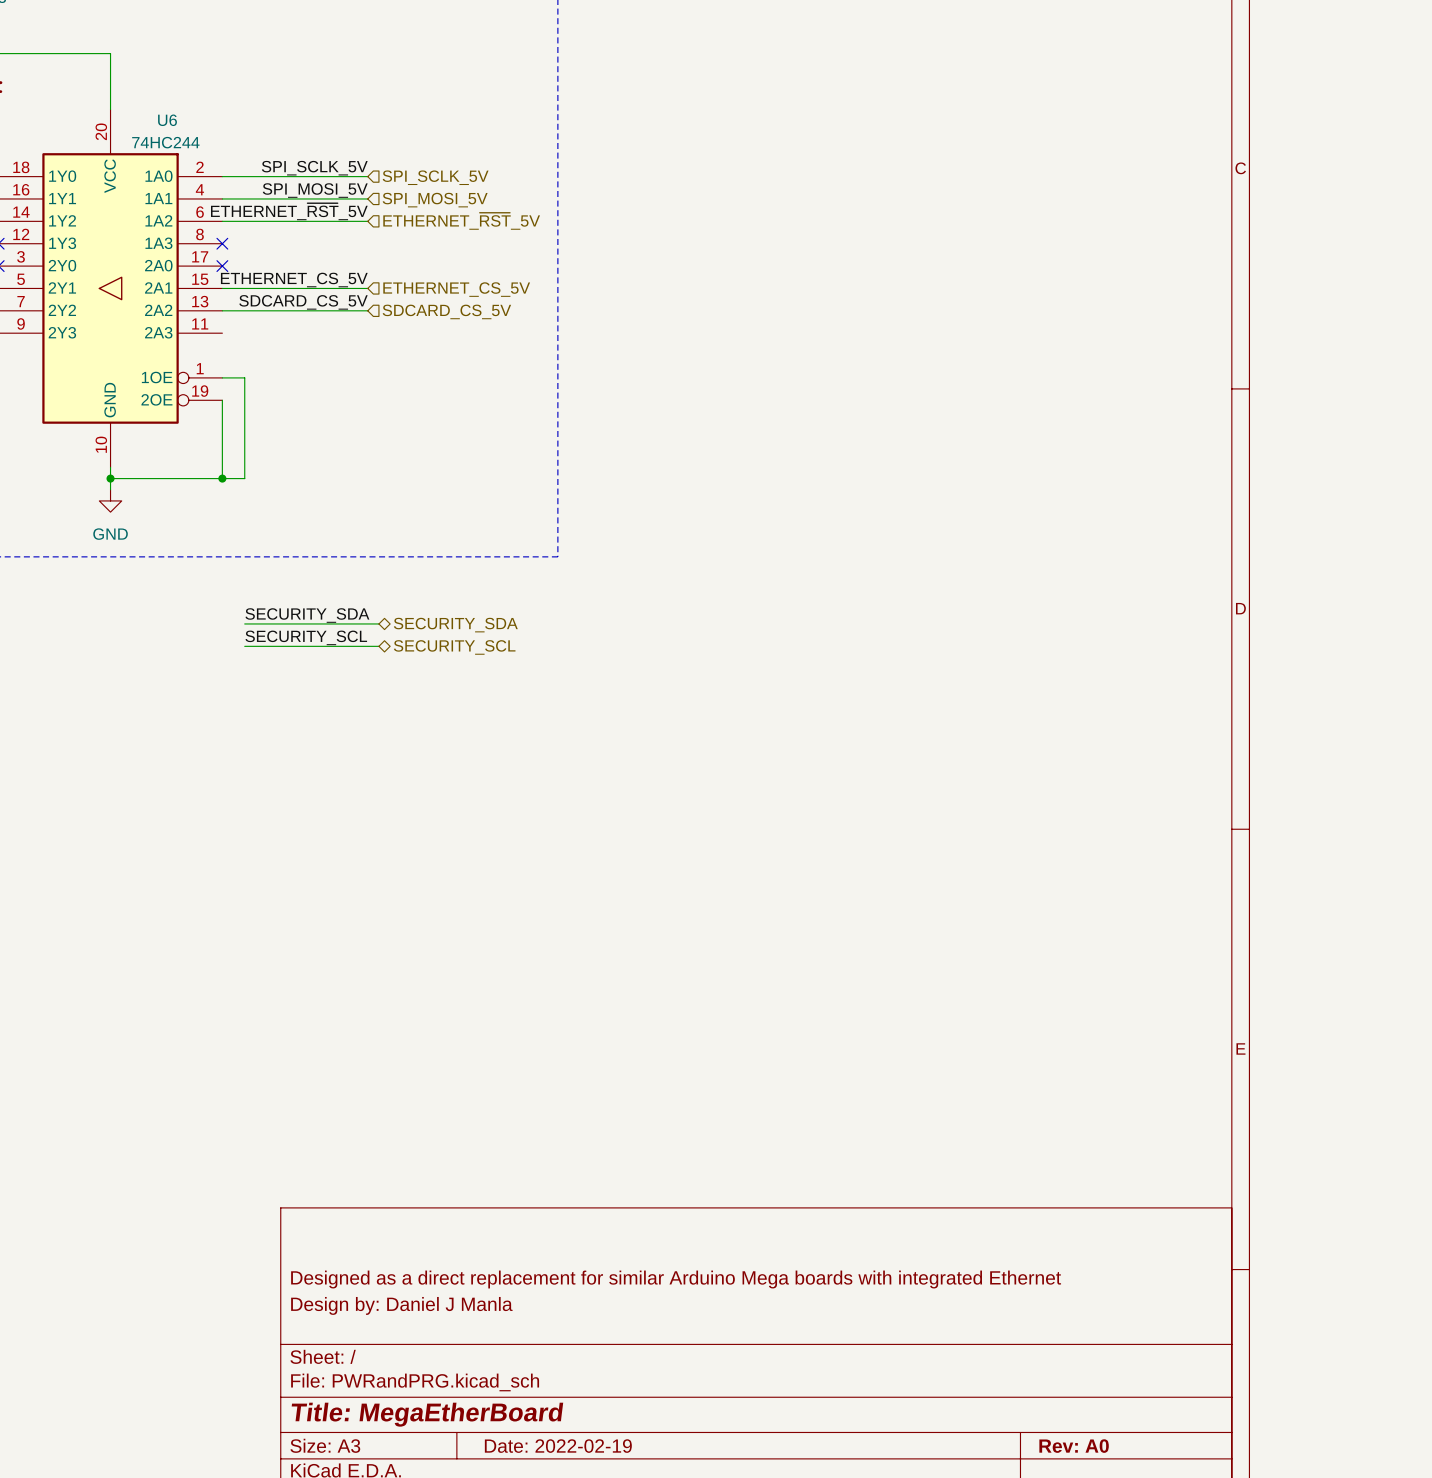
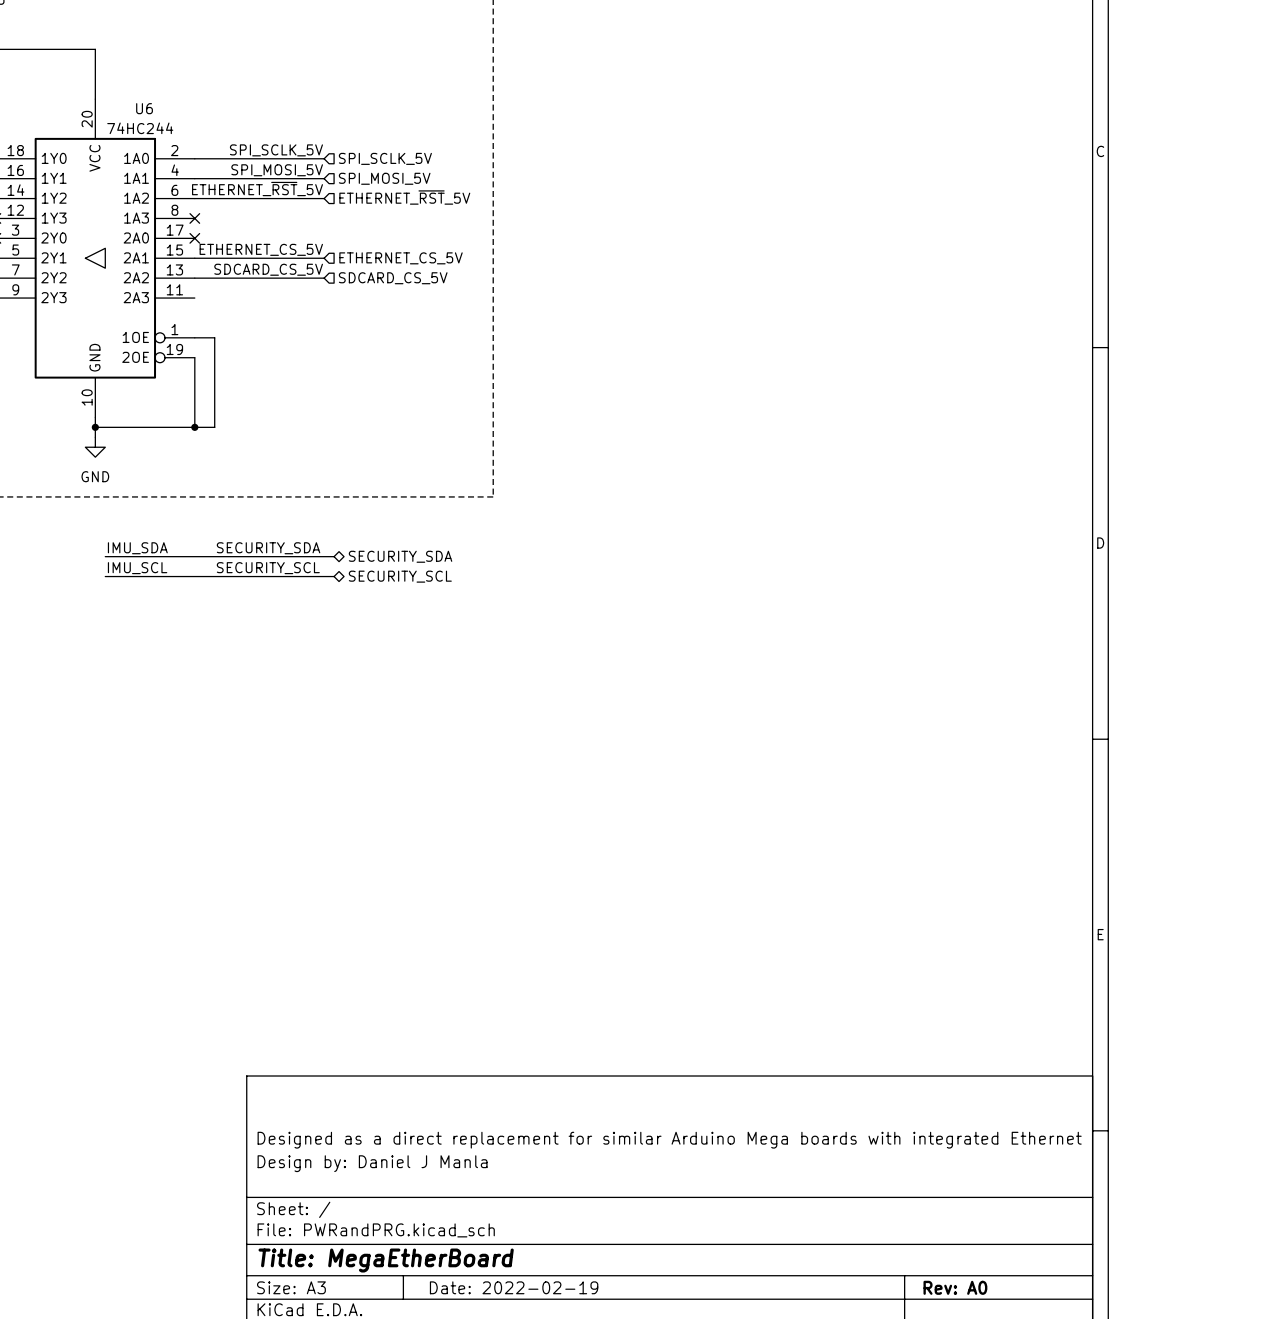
label: none -> IMU_SDA (137, 548)
wire: none -> (105, 556) (214, 556)
label: none -> IMU_SCL (137, 568)
wire: none -> (105, 576) (214, 576)

